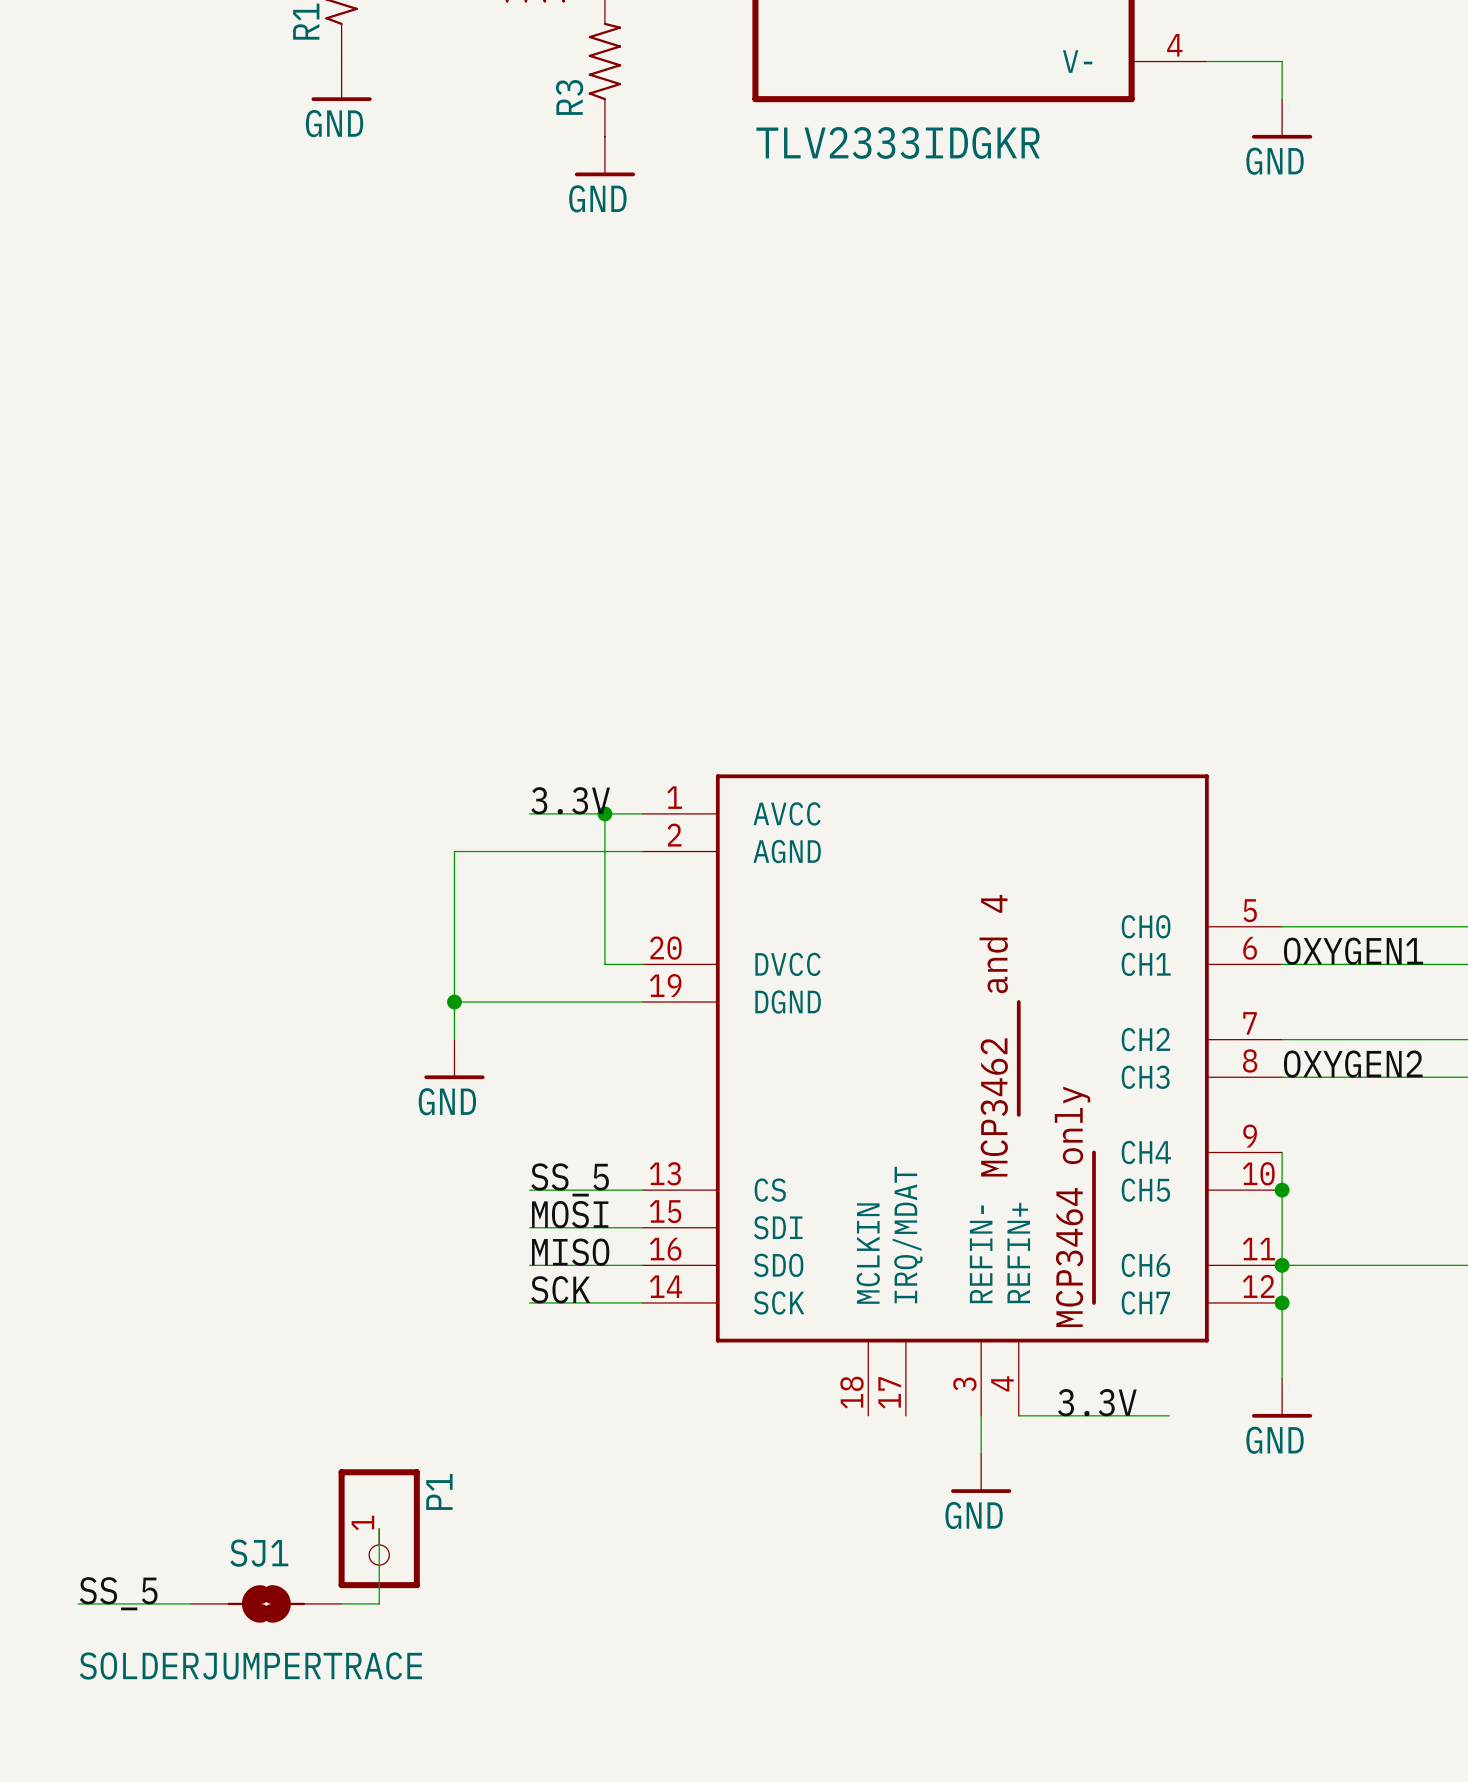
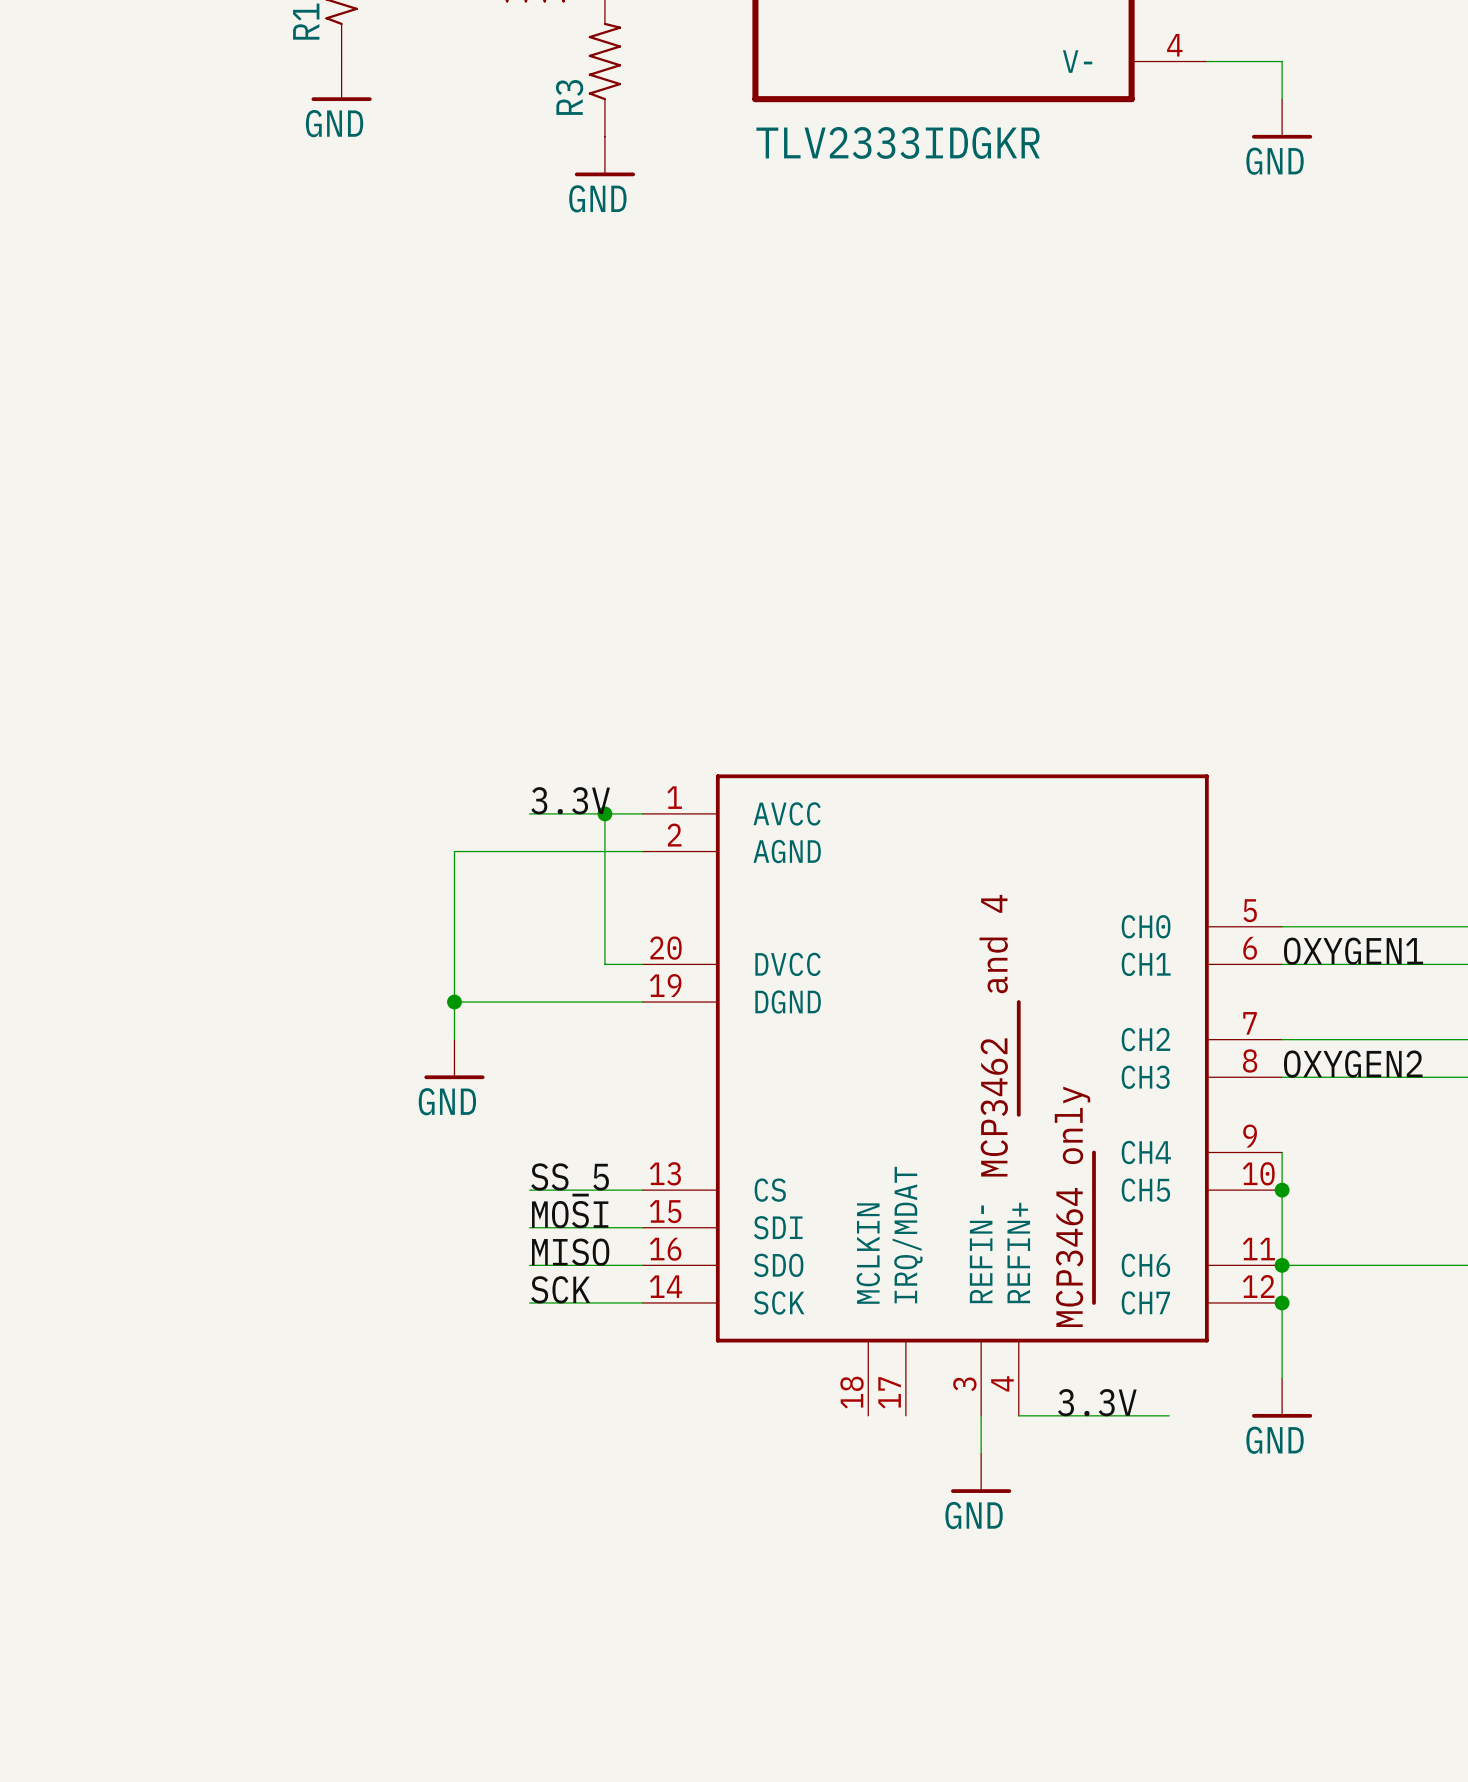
wire: (379, 1528) (379, 1603) (341, 1603) -> none
P1: (379, 1528) -> none
label: SS_5 (118, 1593) -> none
wire: (78, 1603) (191, 1603) -> none
SJ1: SOLDERJUMPERTRACE (266, 1603) -> none

